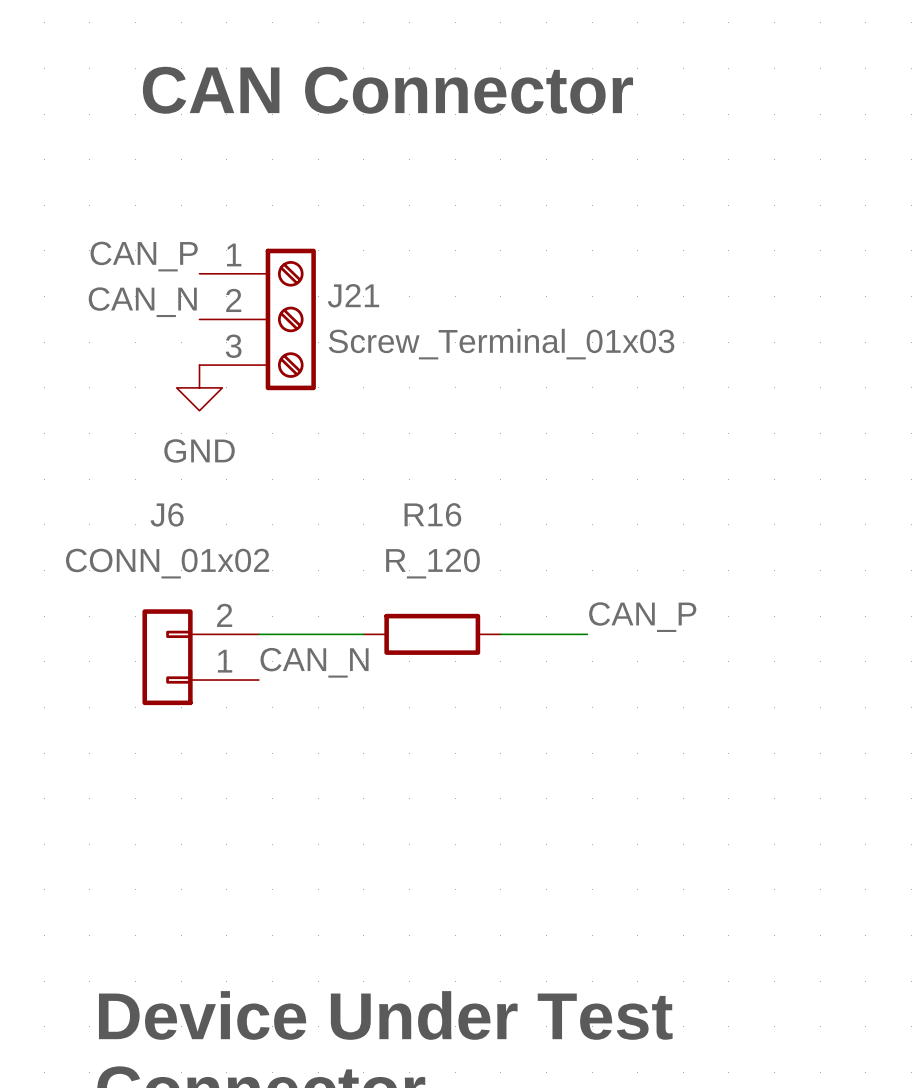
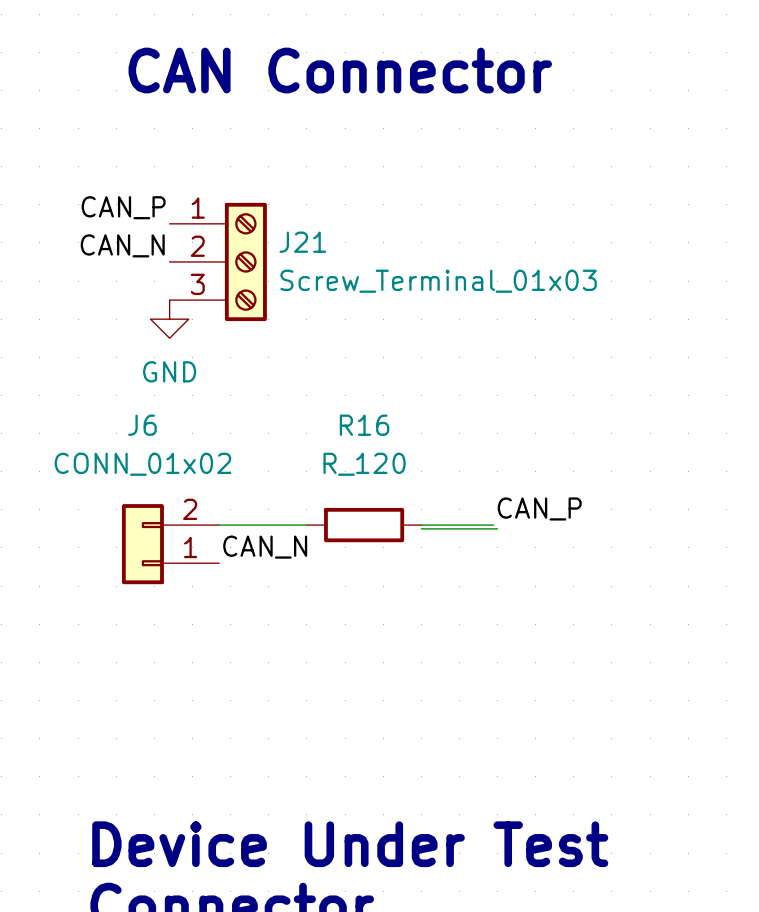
wire: none -> (421, 528) (497, 528)

